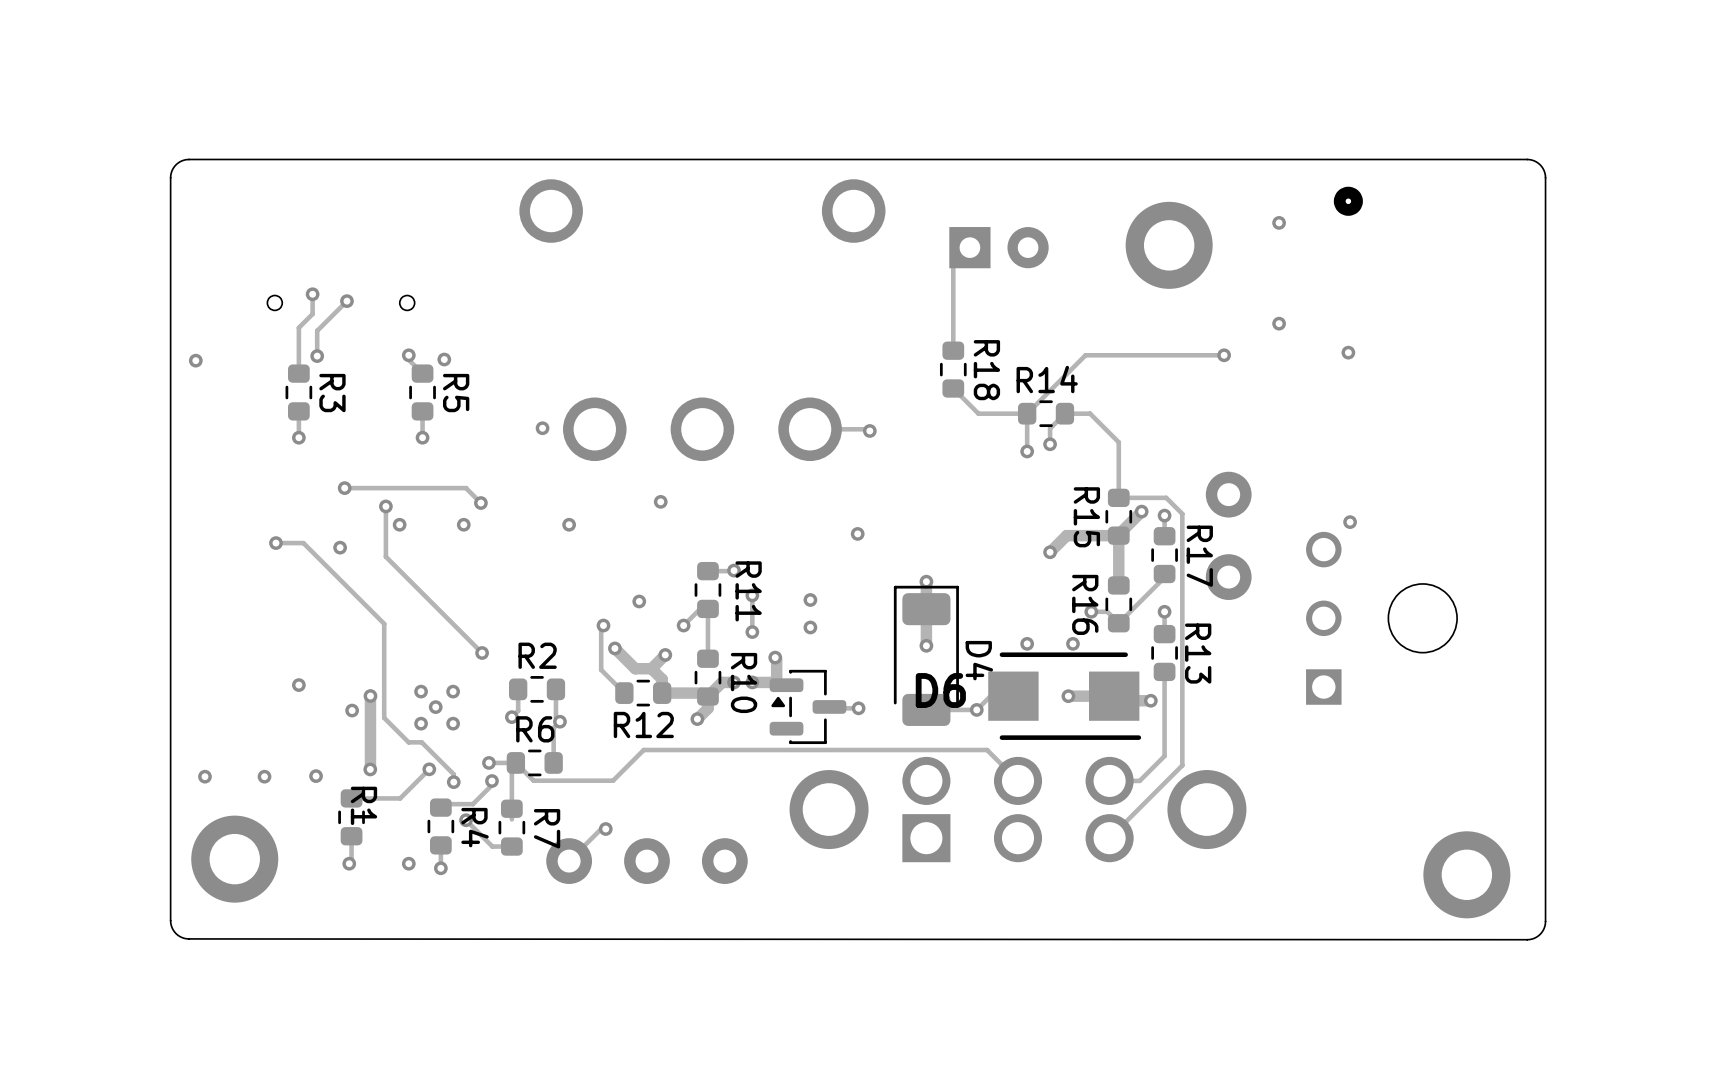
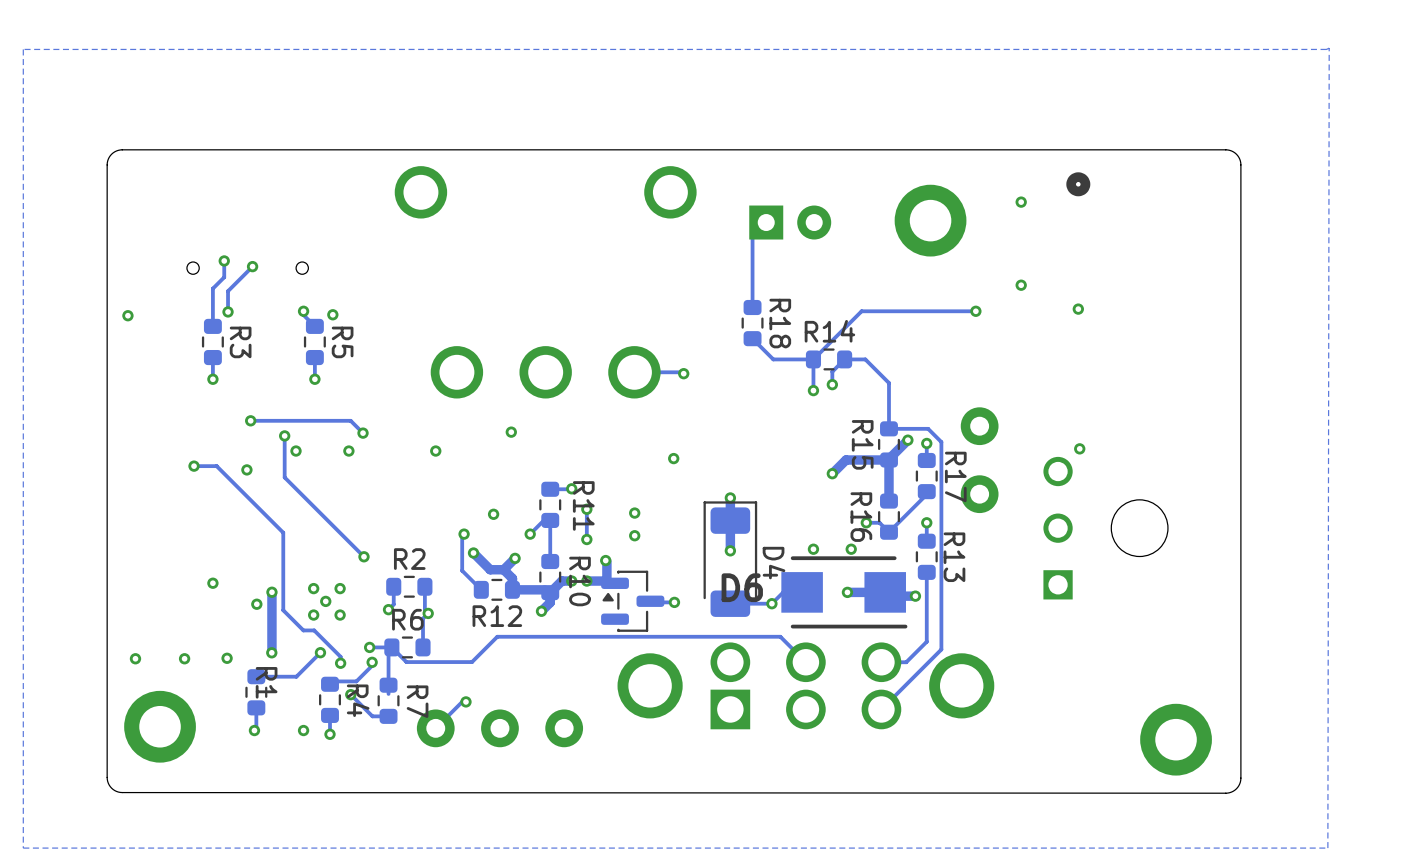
zone outline: none -> (1329, 48) (1327, 848) (23, 848) (23, 49) (1329, 48)
via: (542, 428) -> none

